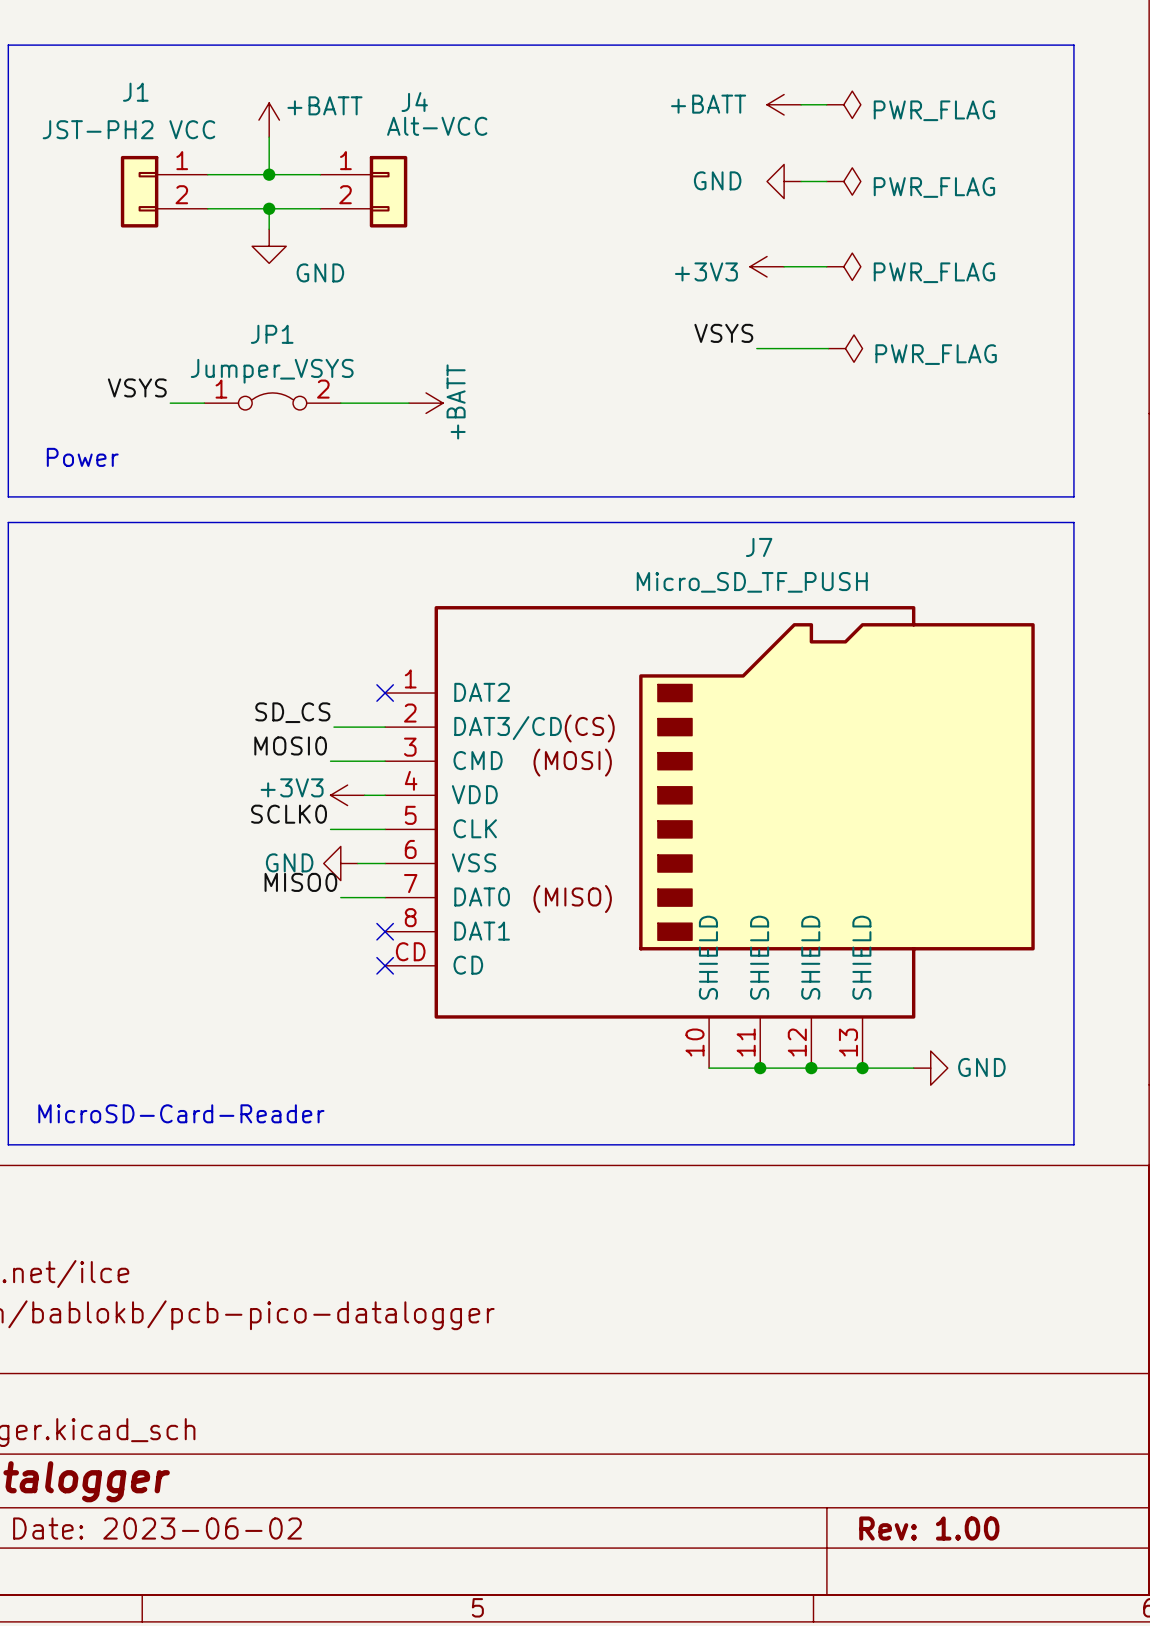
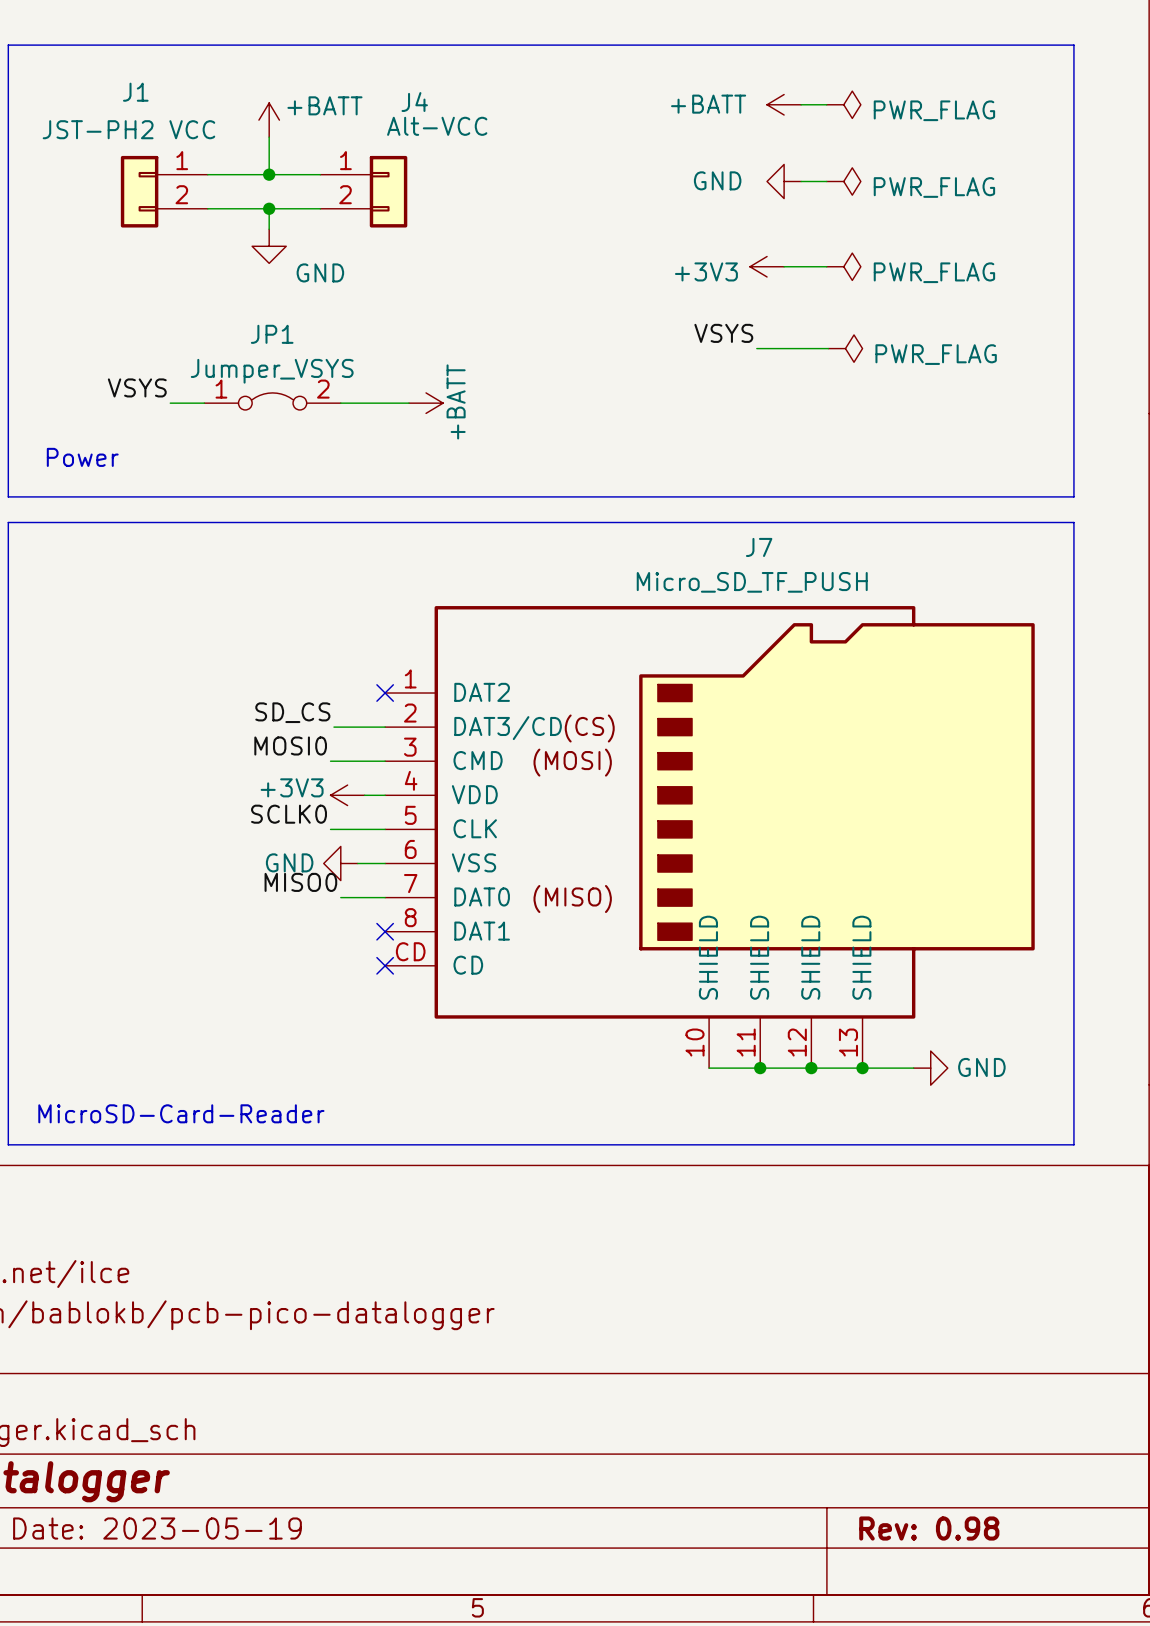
title block: Date: 2023-06-02 (157, 1528) -> Date: 2023-05-19 (157, 1528)
title block: Rev: 1.00 (929, 1528) -> Rev: 0.98 (929, 1528)

